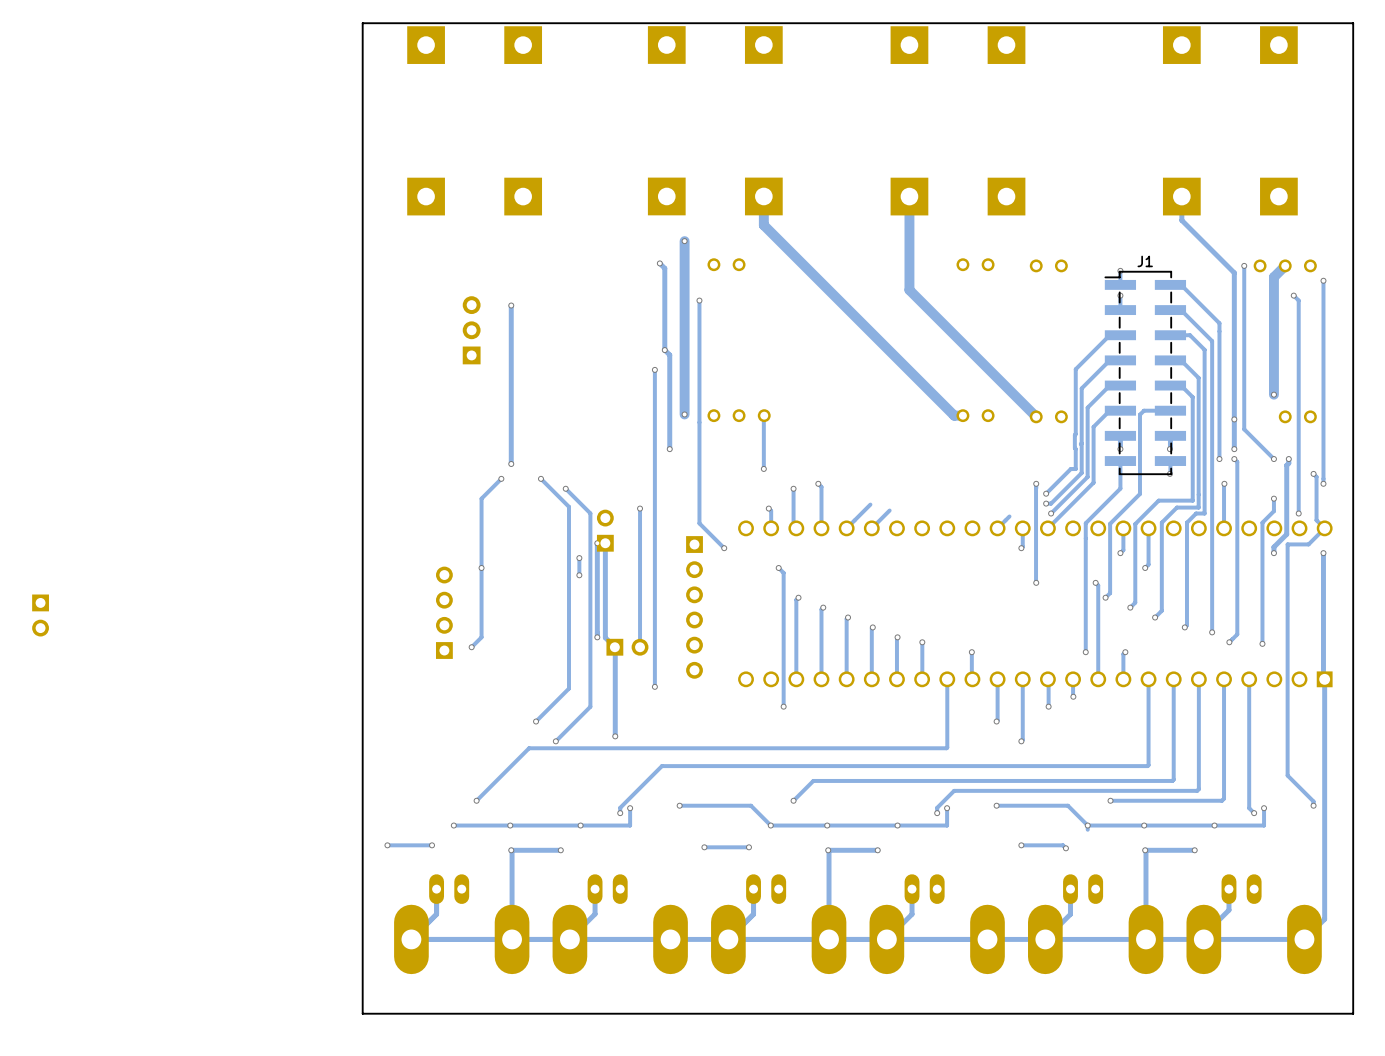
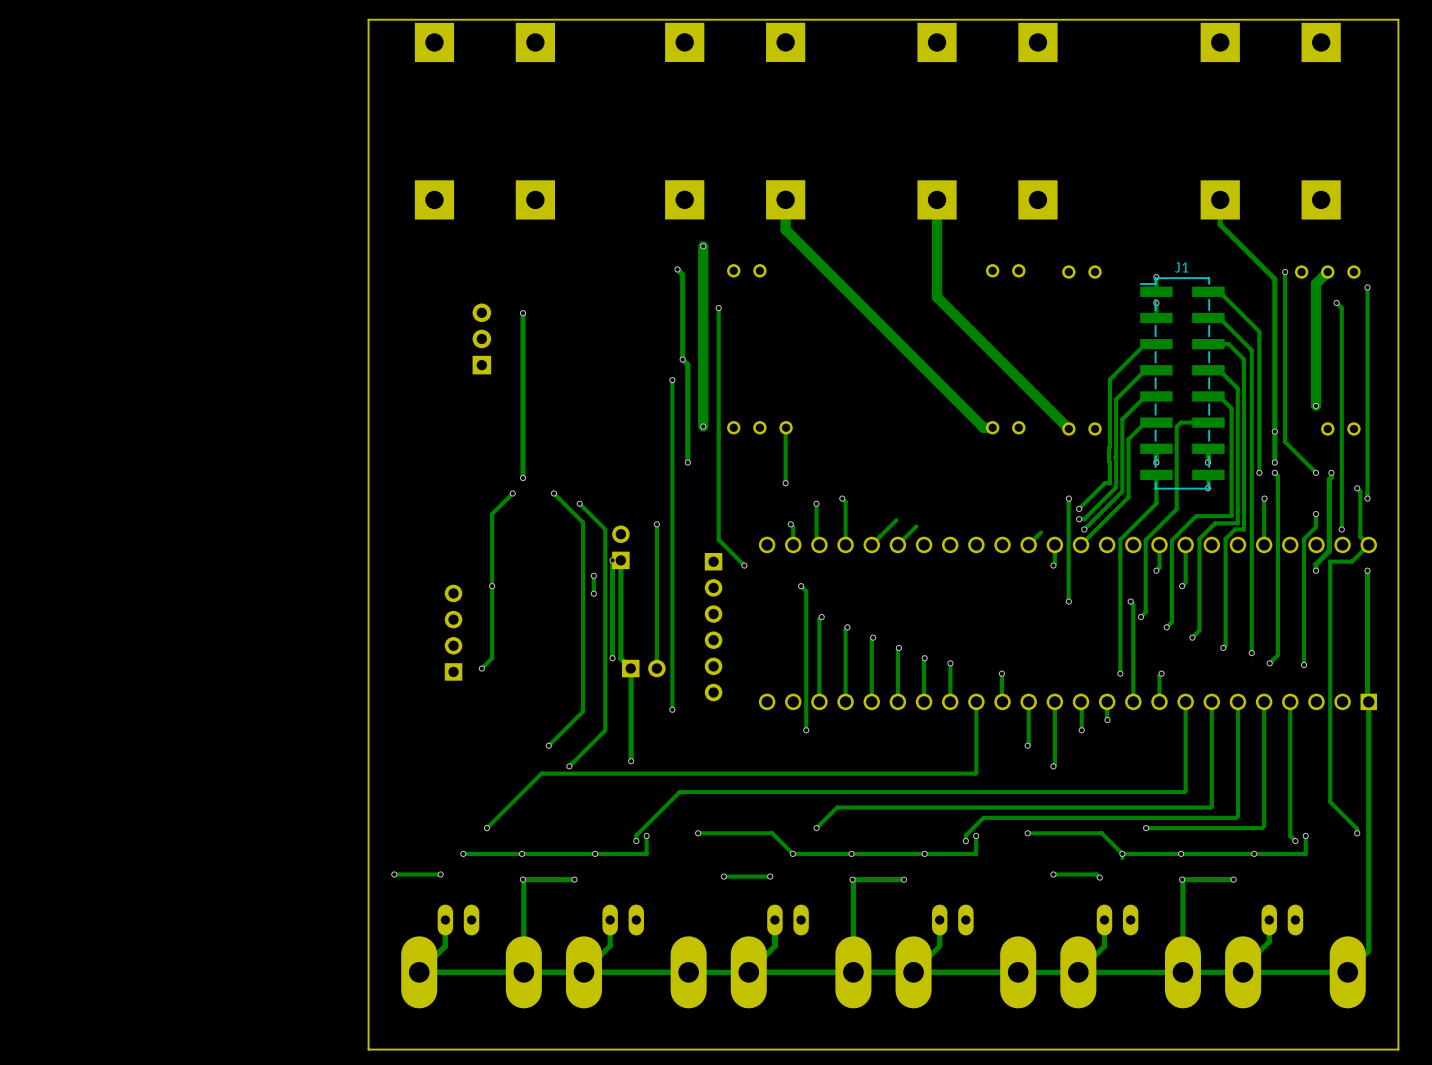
part: (40, 615) -> none

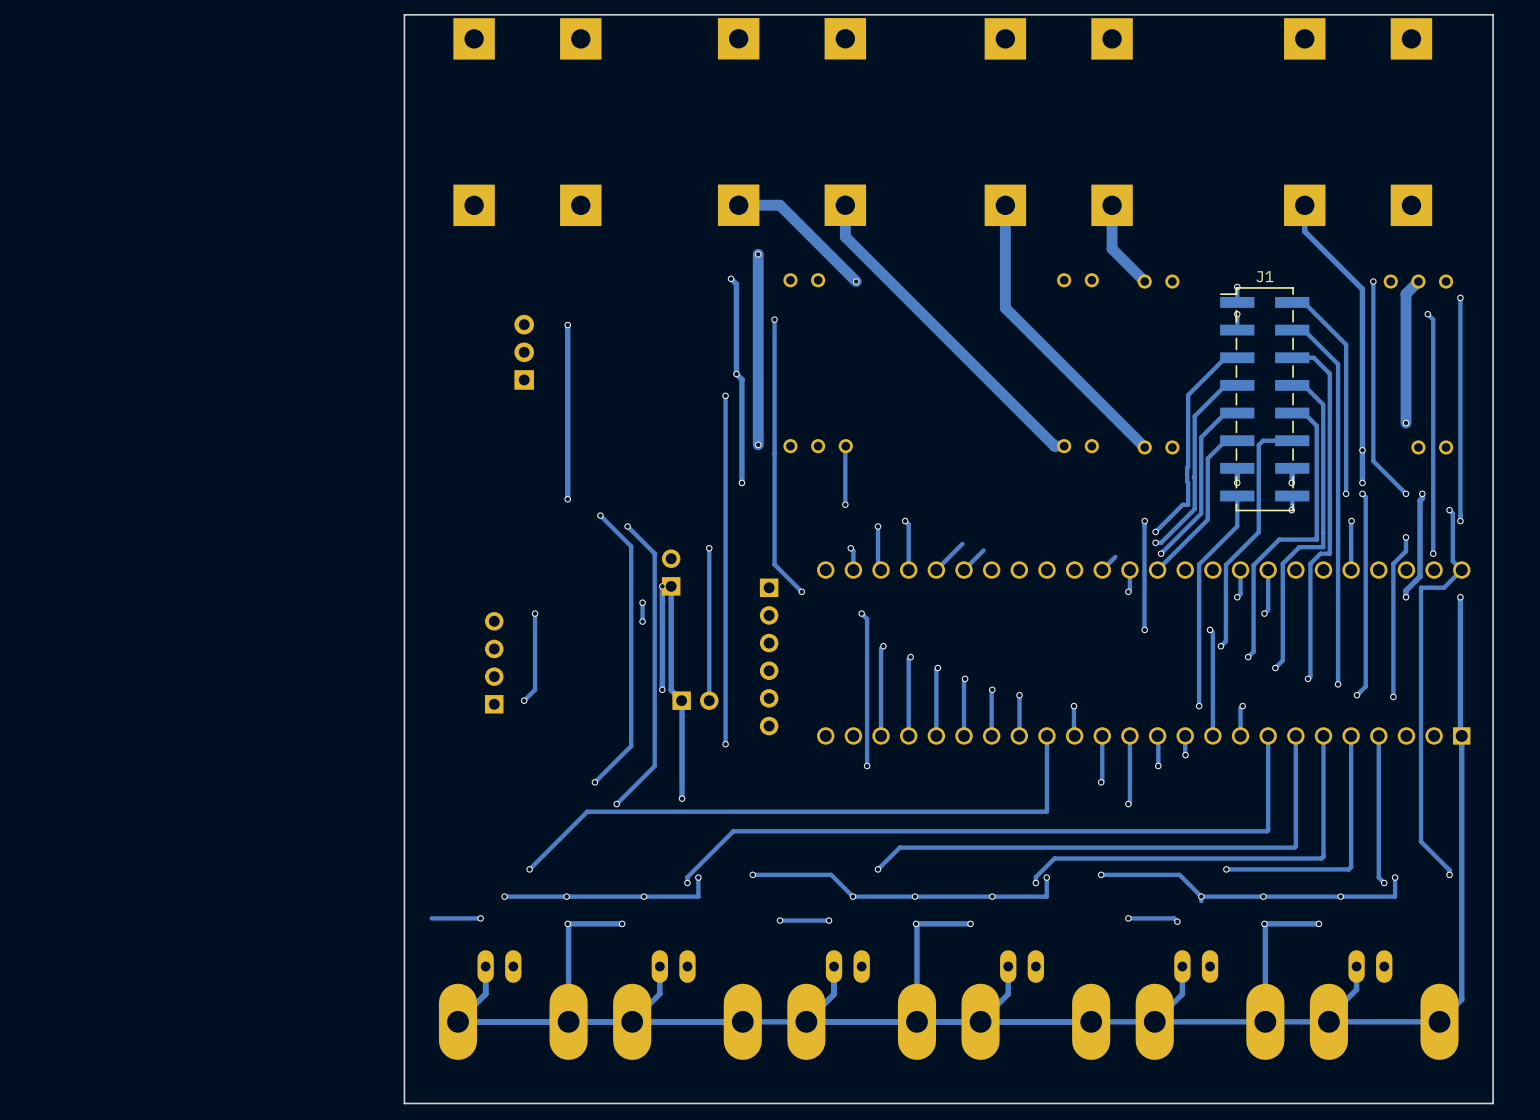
track: none -> (738, 205) (779, 205) (856, 281)
track: none -> (1112, 205) (1112, 248) (1144, 281)
via: none -> (856, 281)
track: (512, 493) (492, 514) (492, 586) -> none
via: (512, 493) -> none
via: (394, 874) -> none

